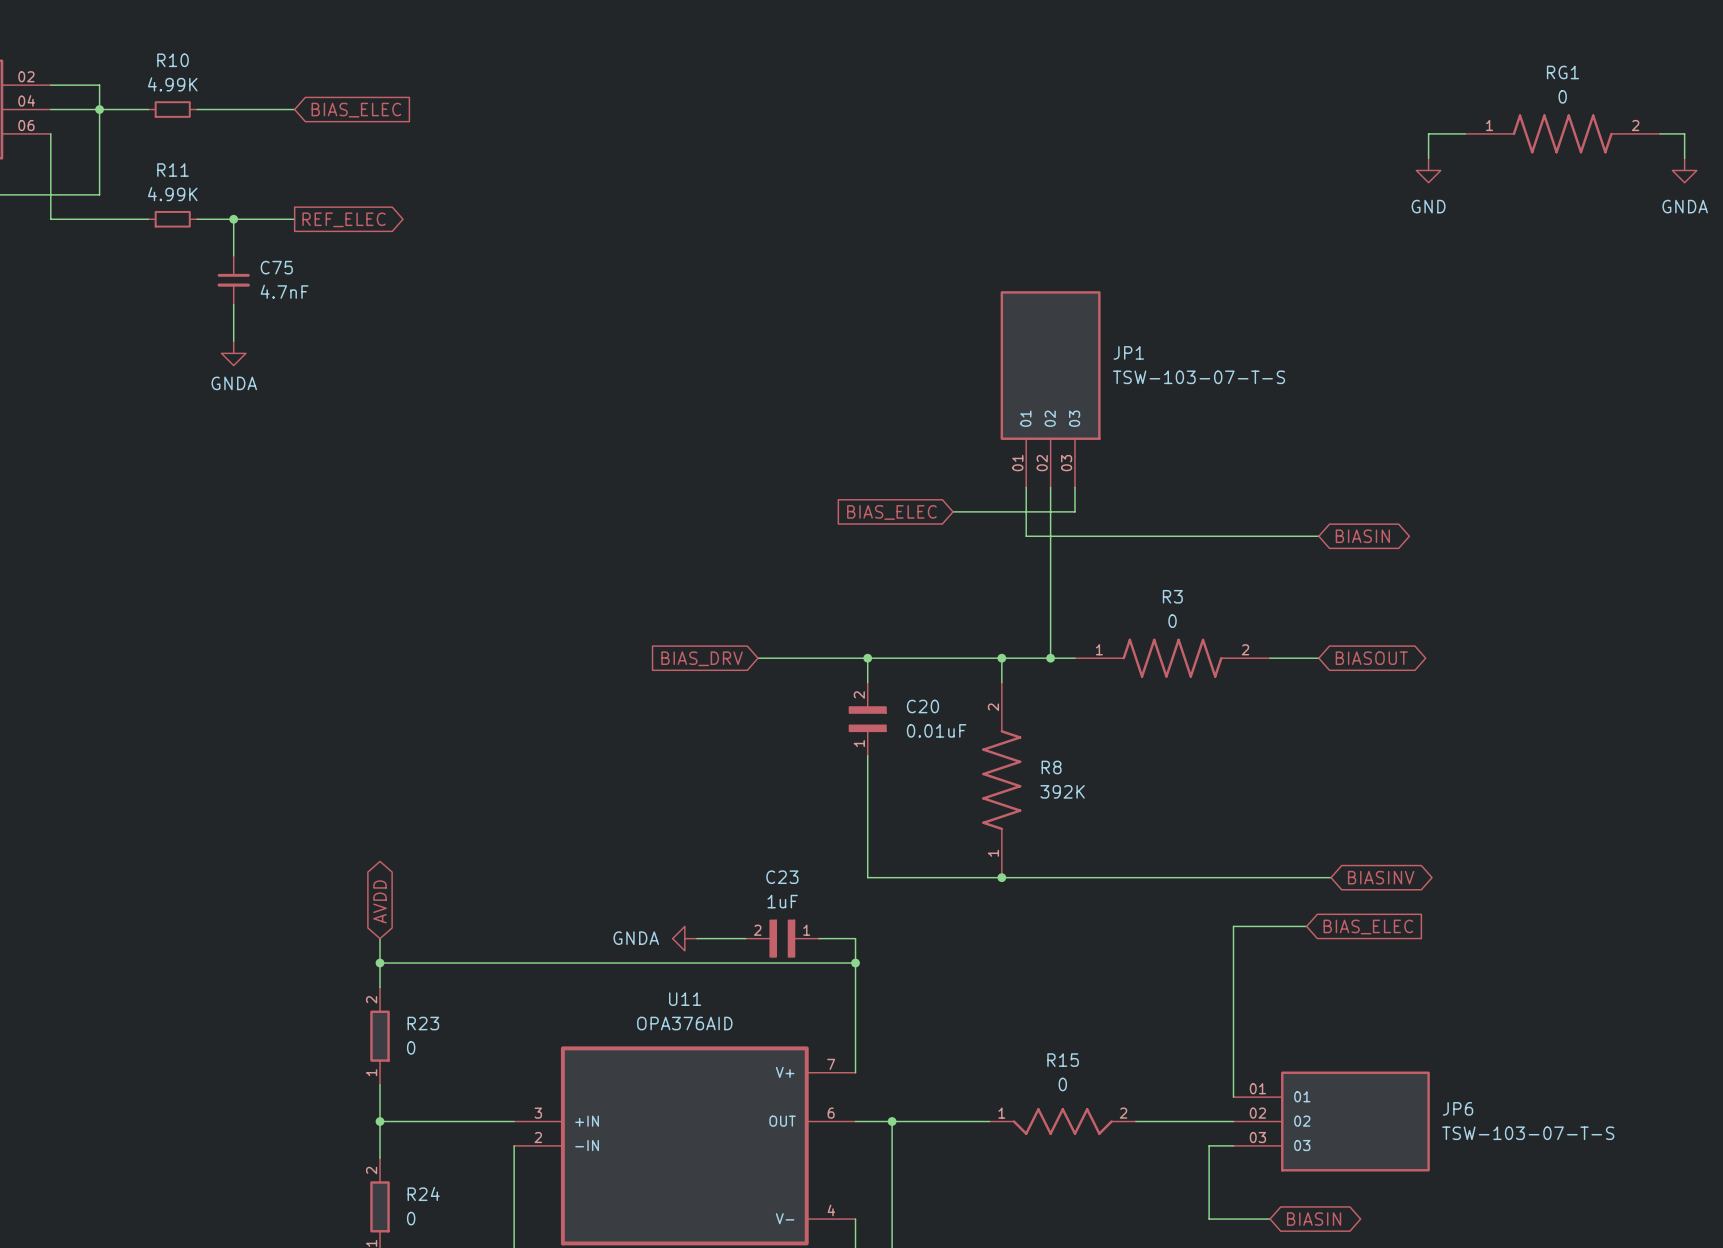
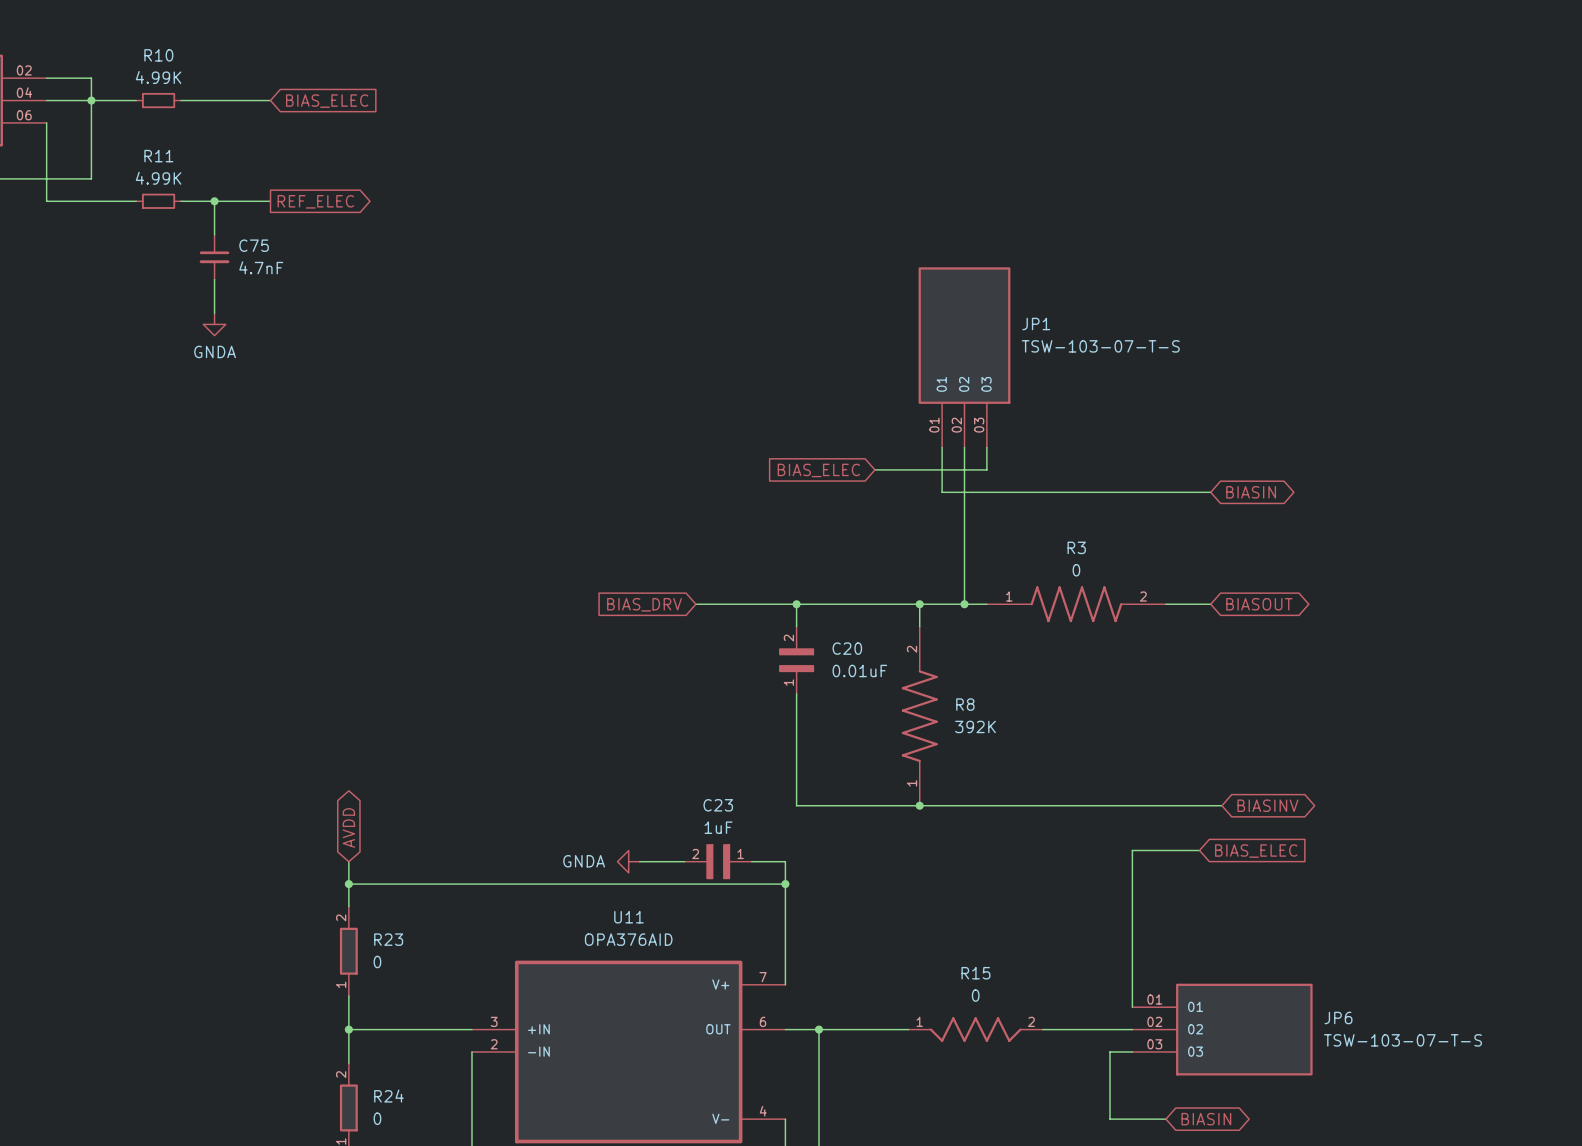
wire: (1465, 133) (1428, 133) (1428, 158) -> none
RG1: 0 (1562, 133) -> none
wire: (1660, 133) (1684, 133) (1684, 158) -> none
power symbol: GND (1428, 170) -> none
power symbol: GNDA (1684, 170) -> none

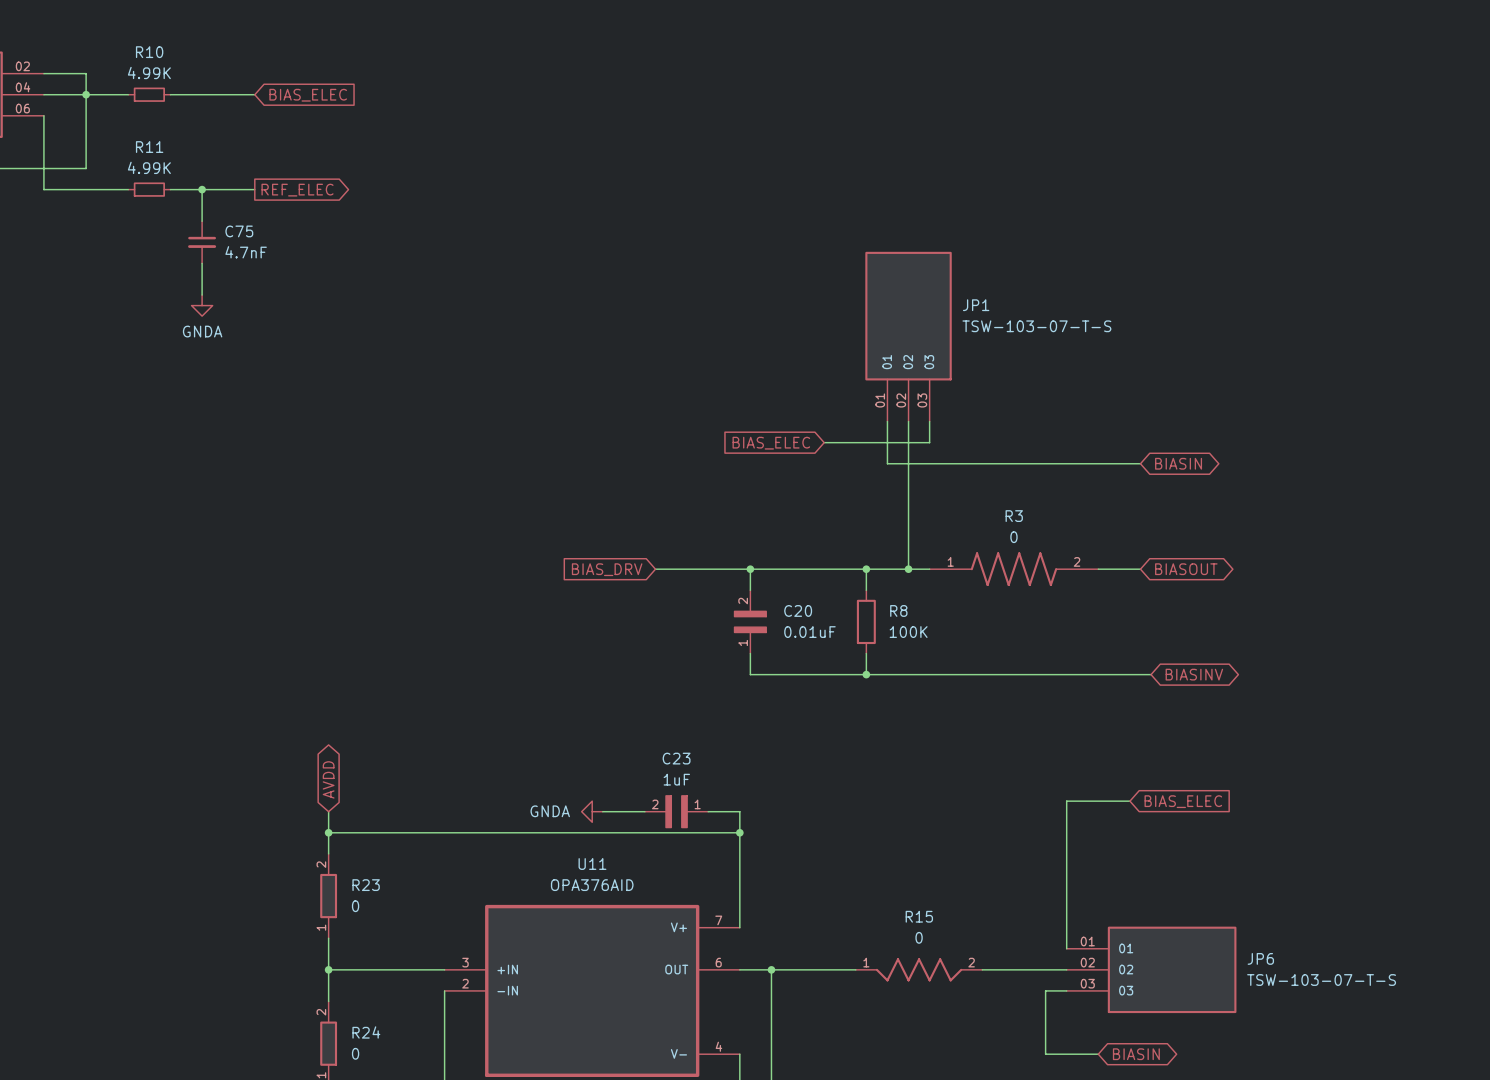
R8 symbol: [901, 626, 938, 806] -> [856, 590, 876, 654]
wire: none -> (866, 653) (866, 674)
wire: (796, 716) (796, 805) (1221, 805) -> (750, 674) (1151, 674)
junction: none -> (866, 674)
R8 value: 392K (975, 726) -> 100K (908, 632)
junction: (919, 805) -> none
global label position: BIASINV (1267, 805) -> BIASINV (1194, 674)

